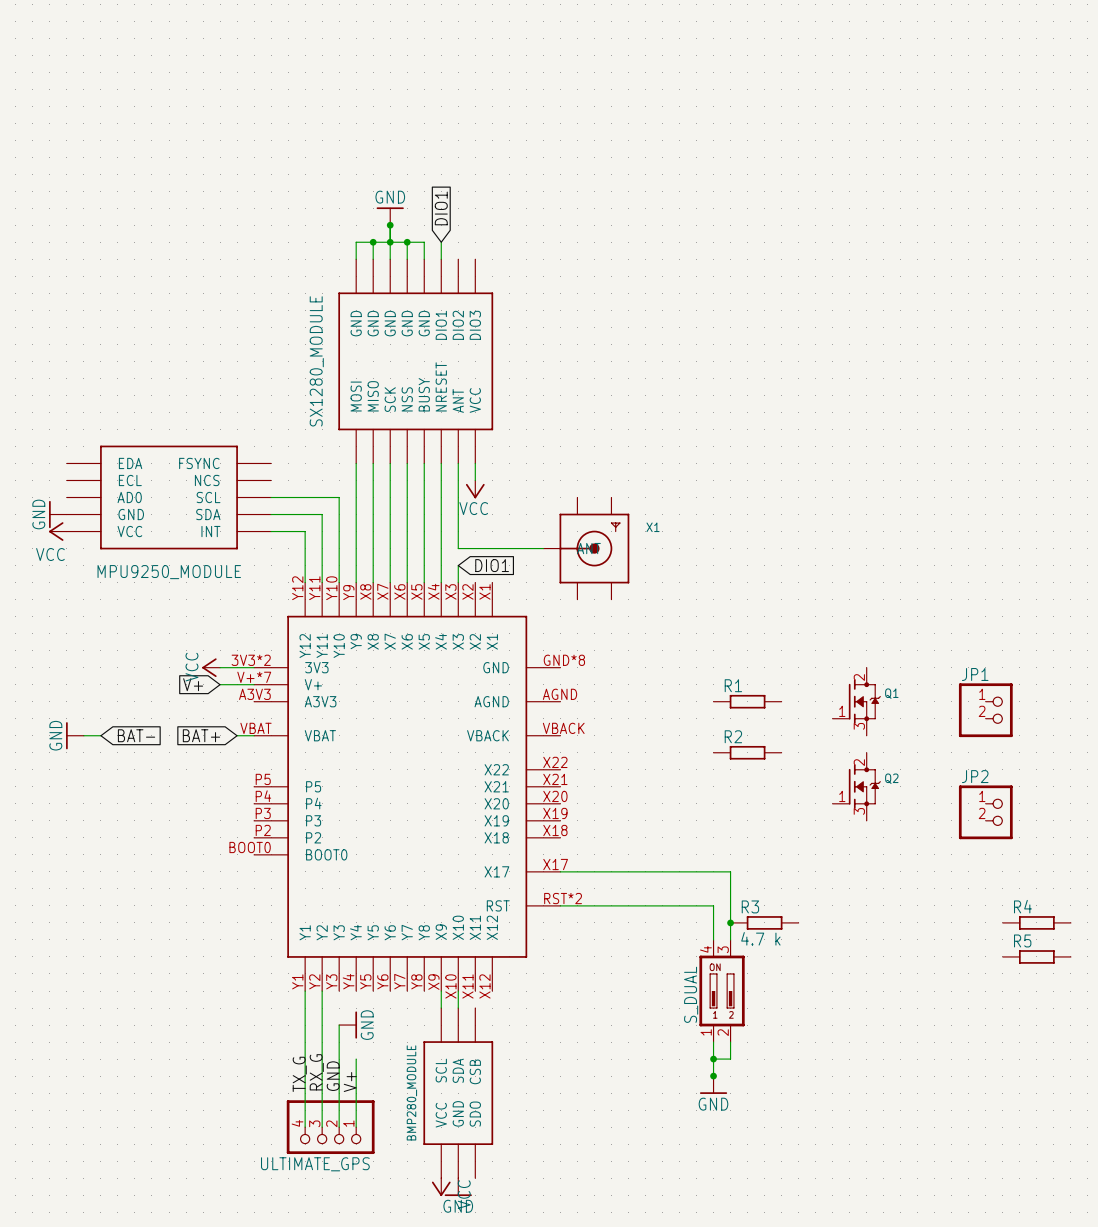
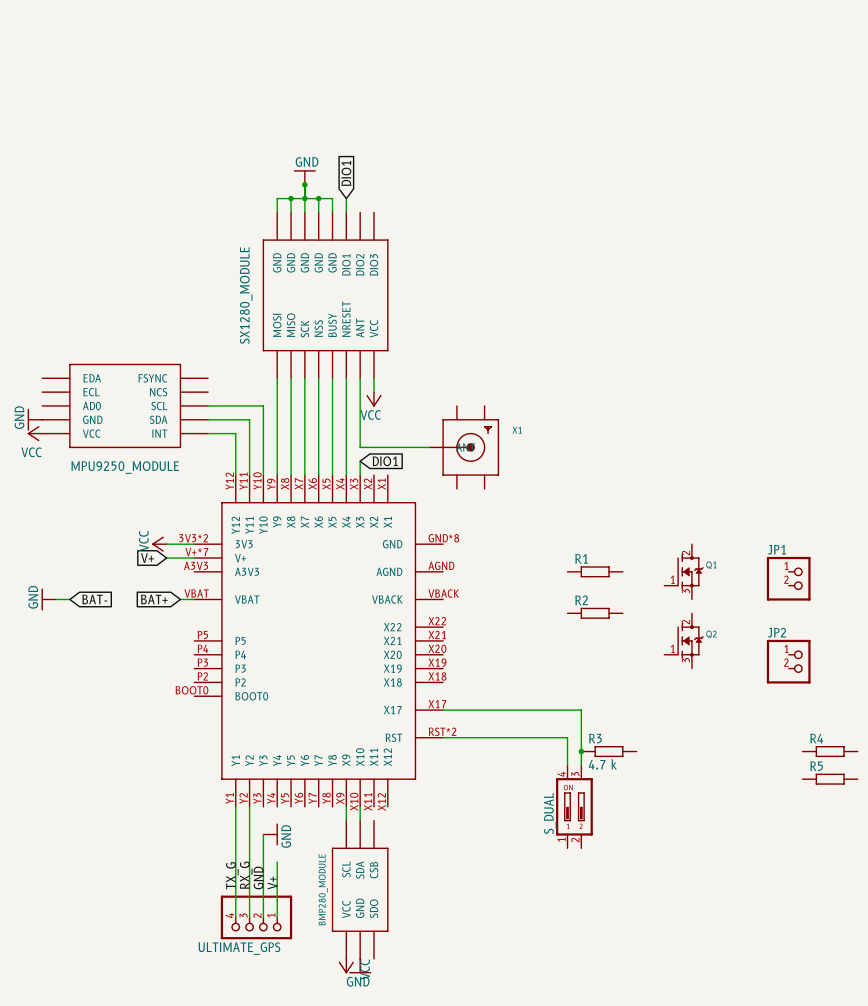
wire: (713, 1042) (713, 1076) -> none
wire: (730, 1042) (730, 1059) (713, 1059) -> none
junction: (713, 1059) -> none
junction: (713, 1076) -> none
power symbol: GND (713, 1085) -> none

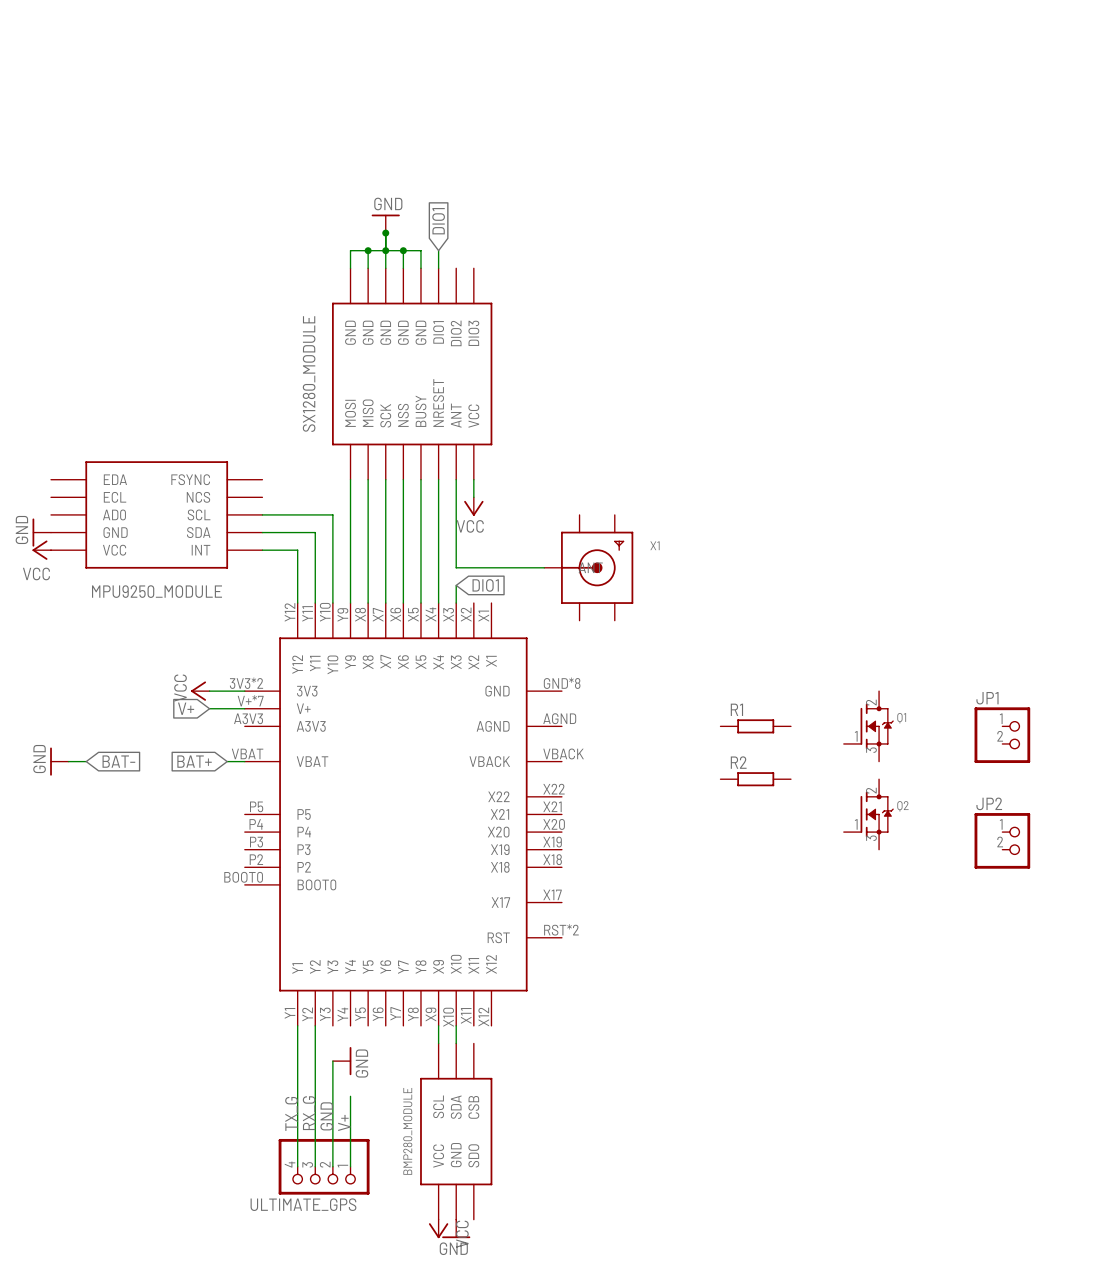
wire: (443, 710) (581, 710) (581, 765) -> none
wire: (443, 737) (567, 737) (567, 765) -> none
junction: (581, 751) -> none
R3: 4.7 k (608, 751) -> none
R4: (830, 751) -> none
R5: (830, 779) -> none
part: (574, 806) -> none

